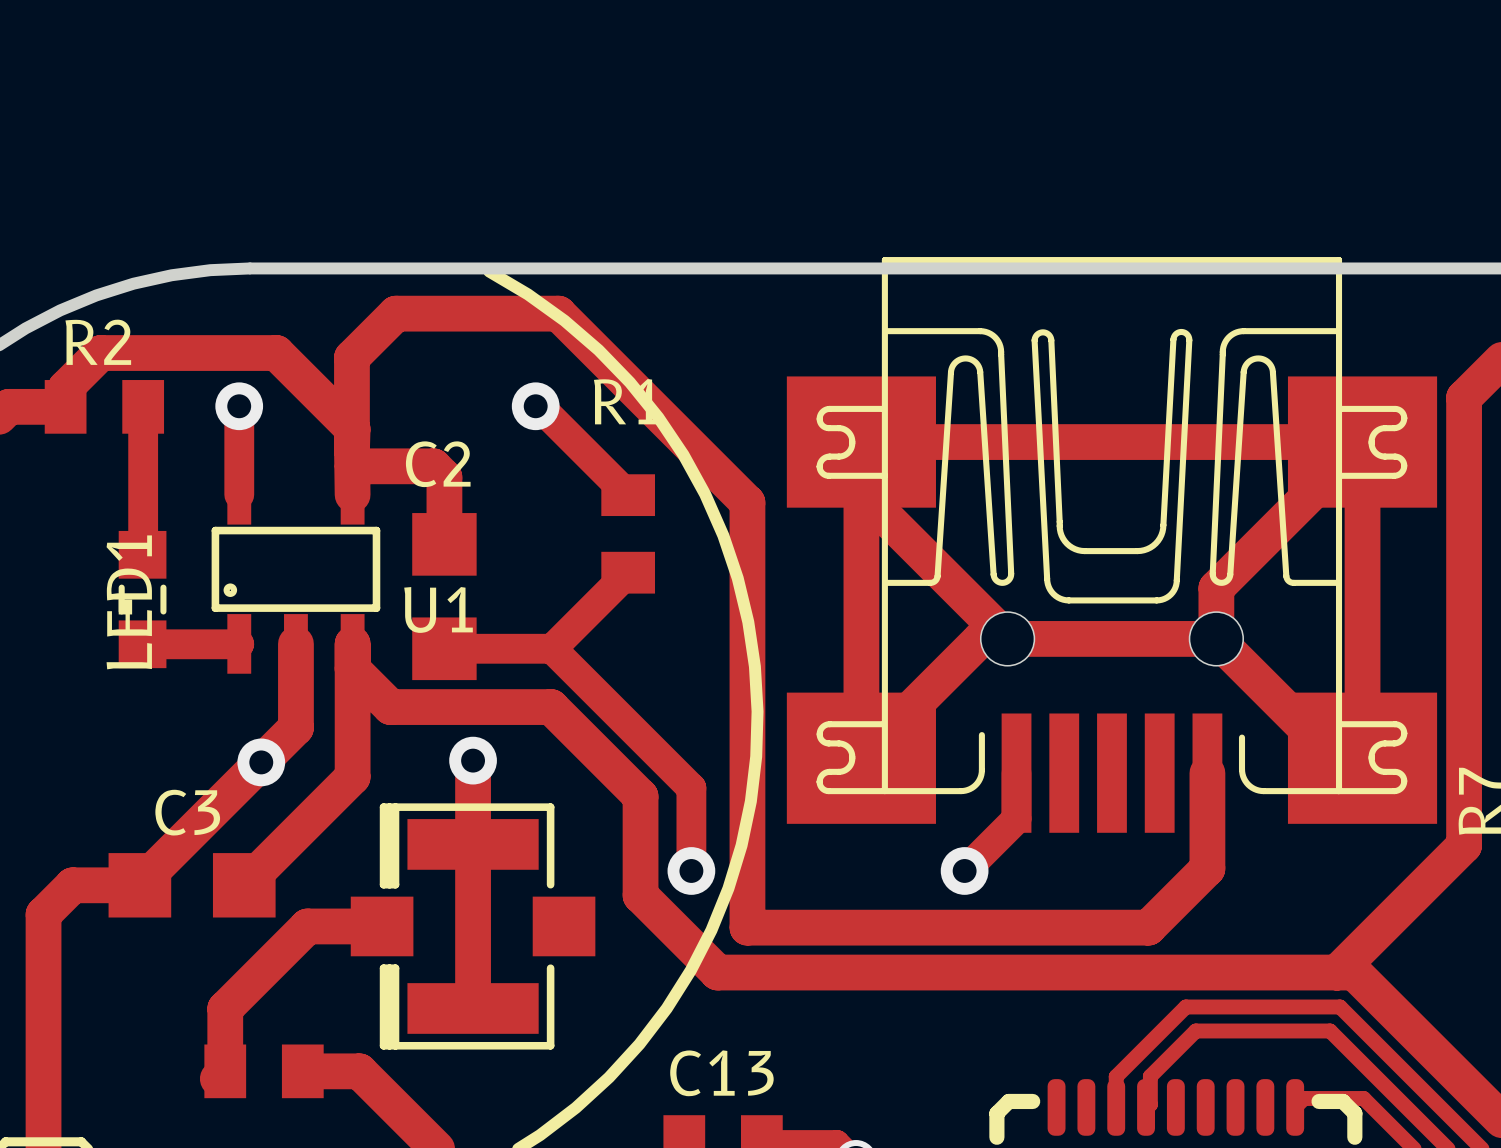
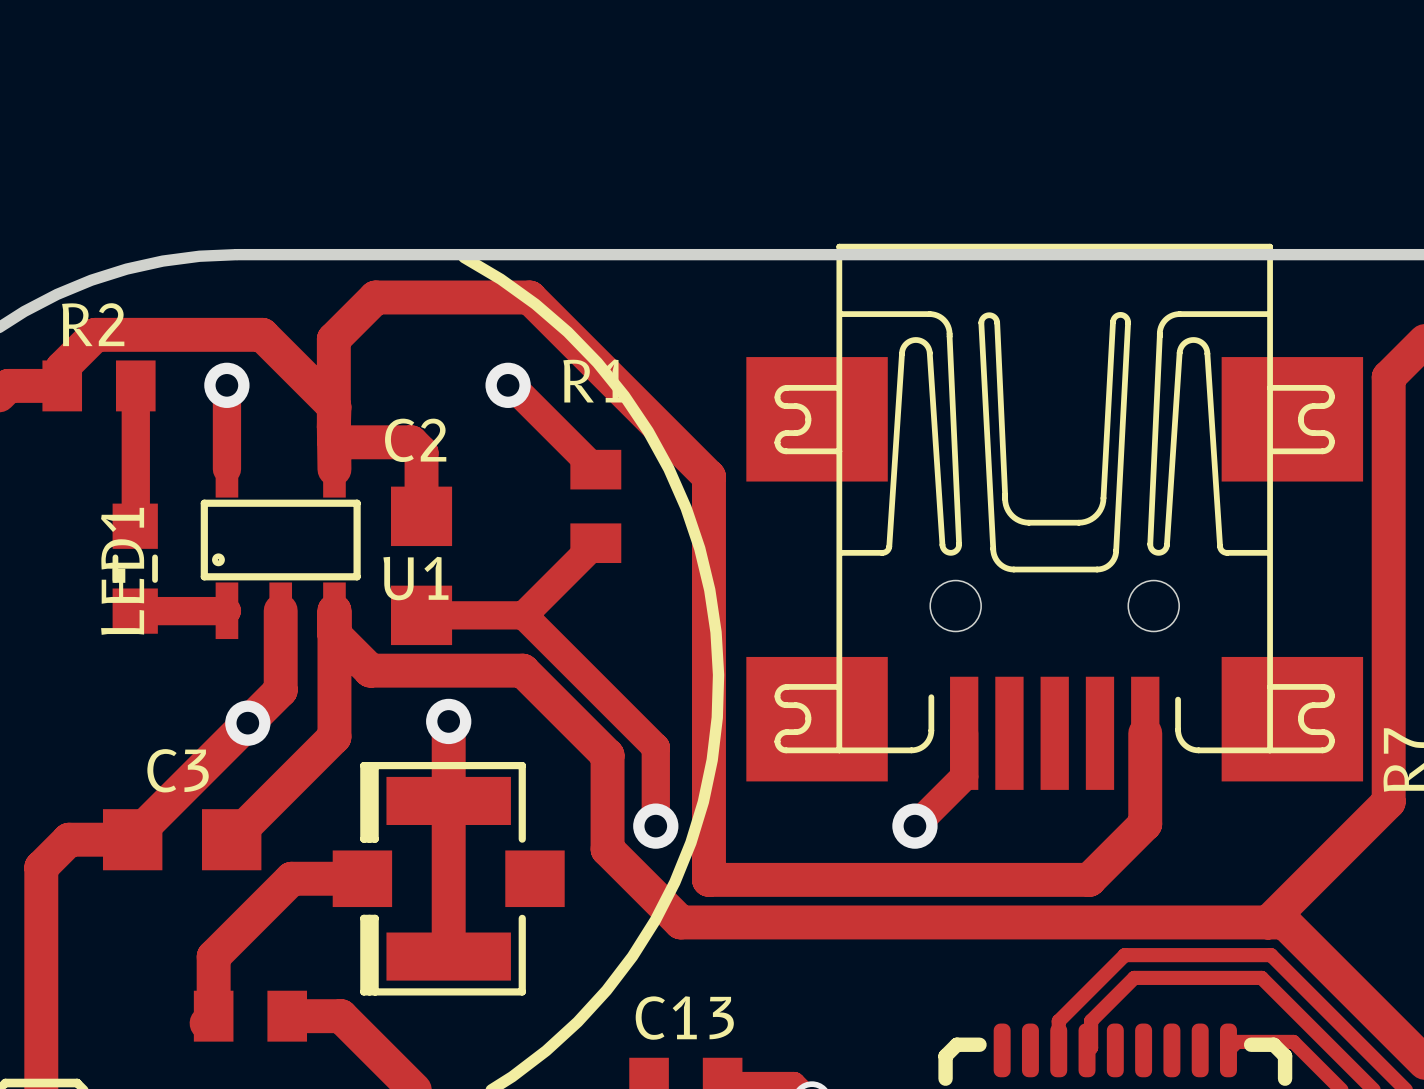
track: (1362, 442) (1362, 758) (1335, 758) (1216, 638) -> none
track: (1362, 442) (861, 442) (861, 758) (980, 638) (1216, 638) -> none
track: (1362, 442) (1216, 588) (1216, 638) -> none
track: (861, 492) (1007, 638) -> none

